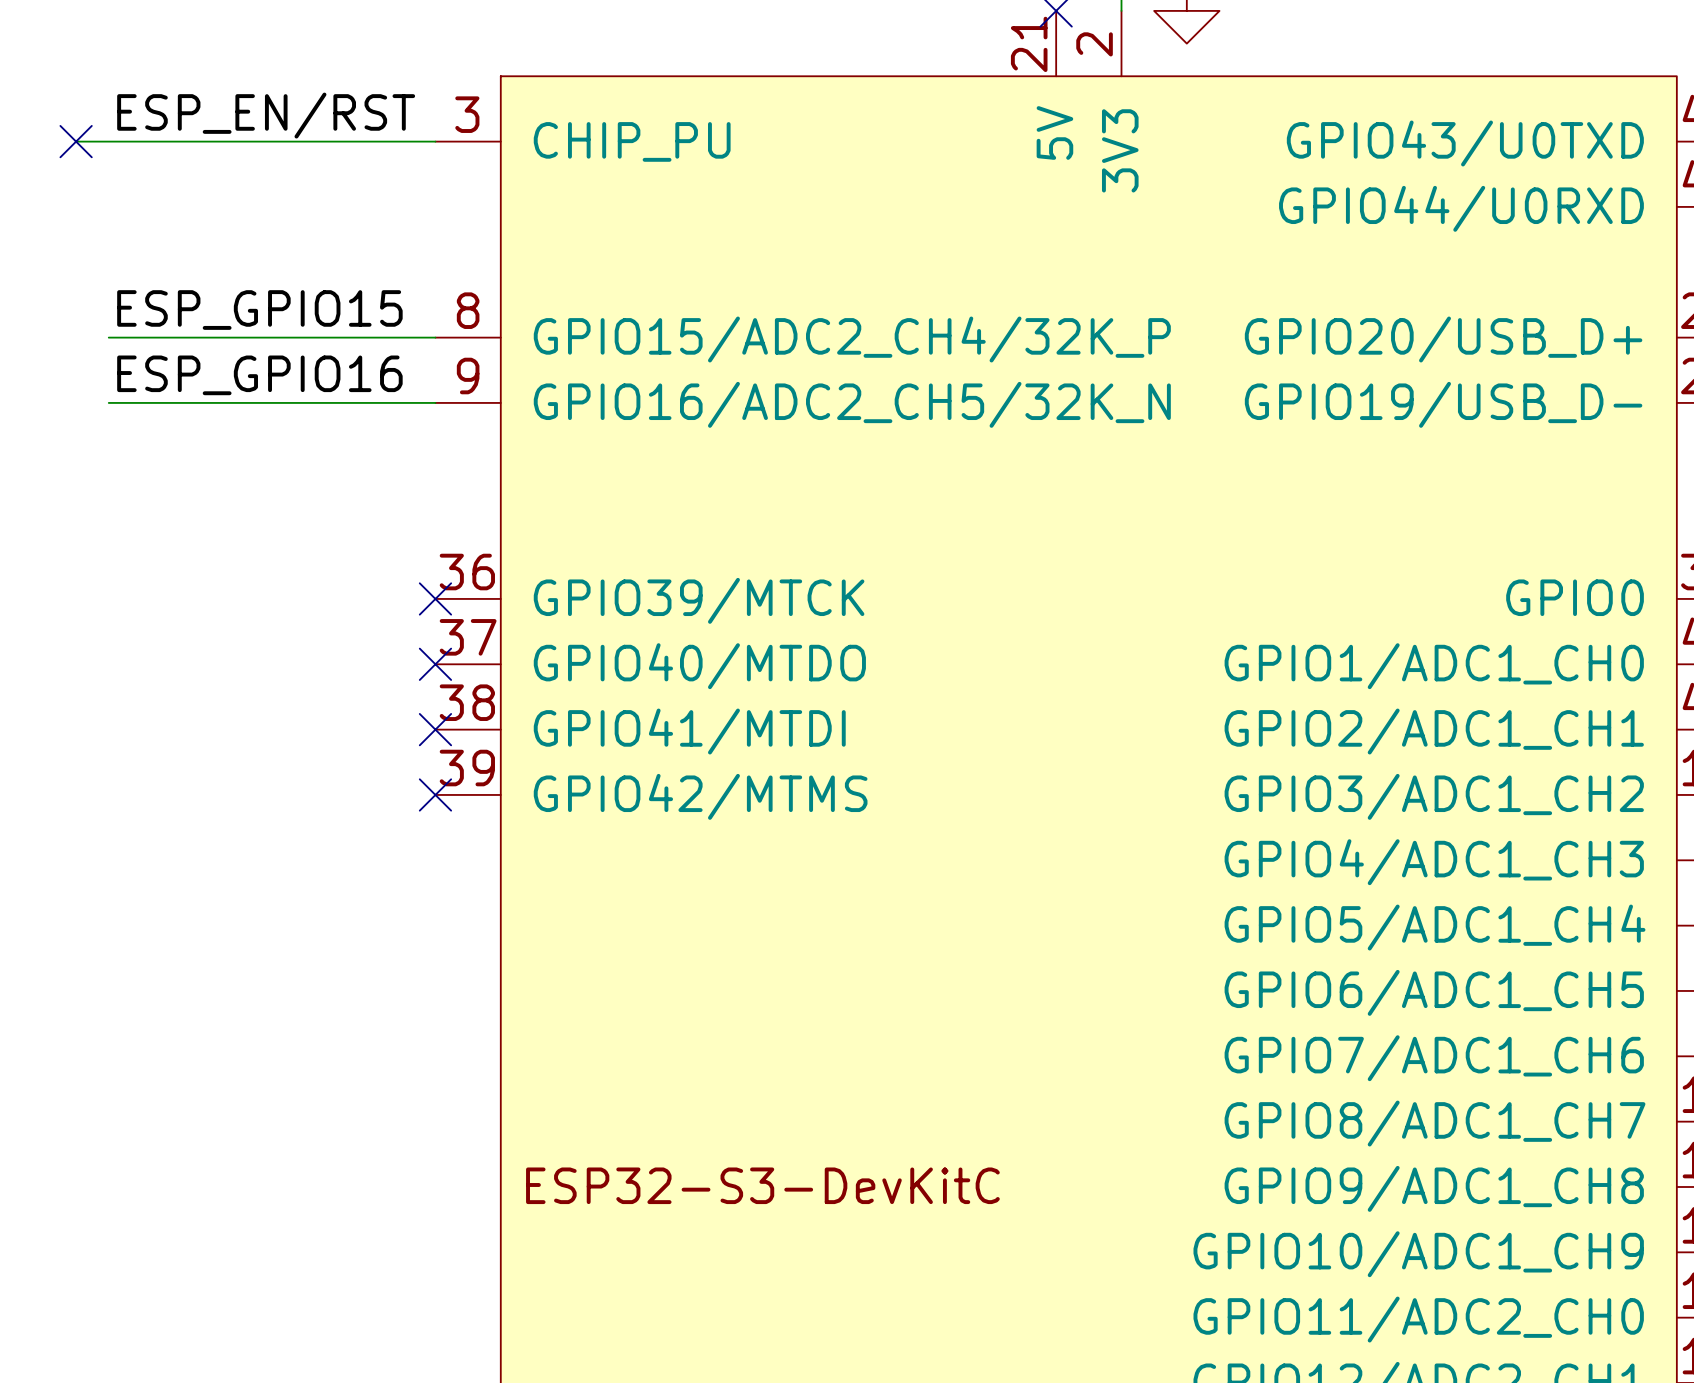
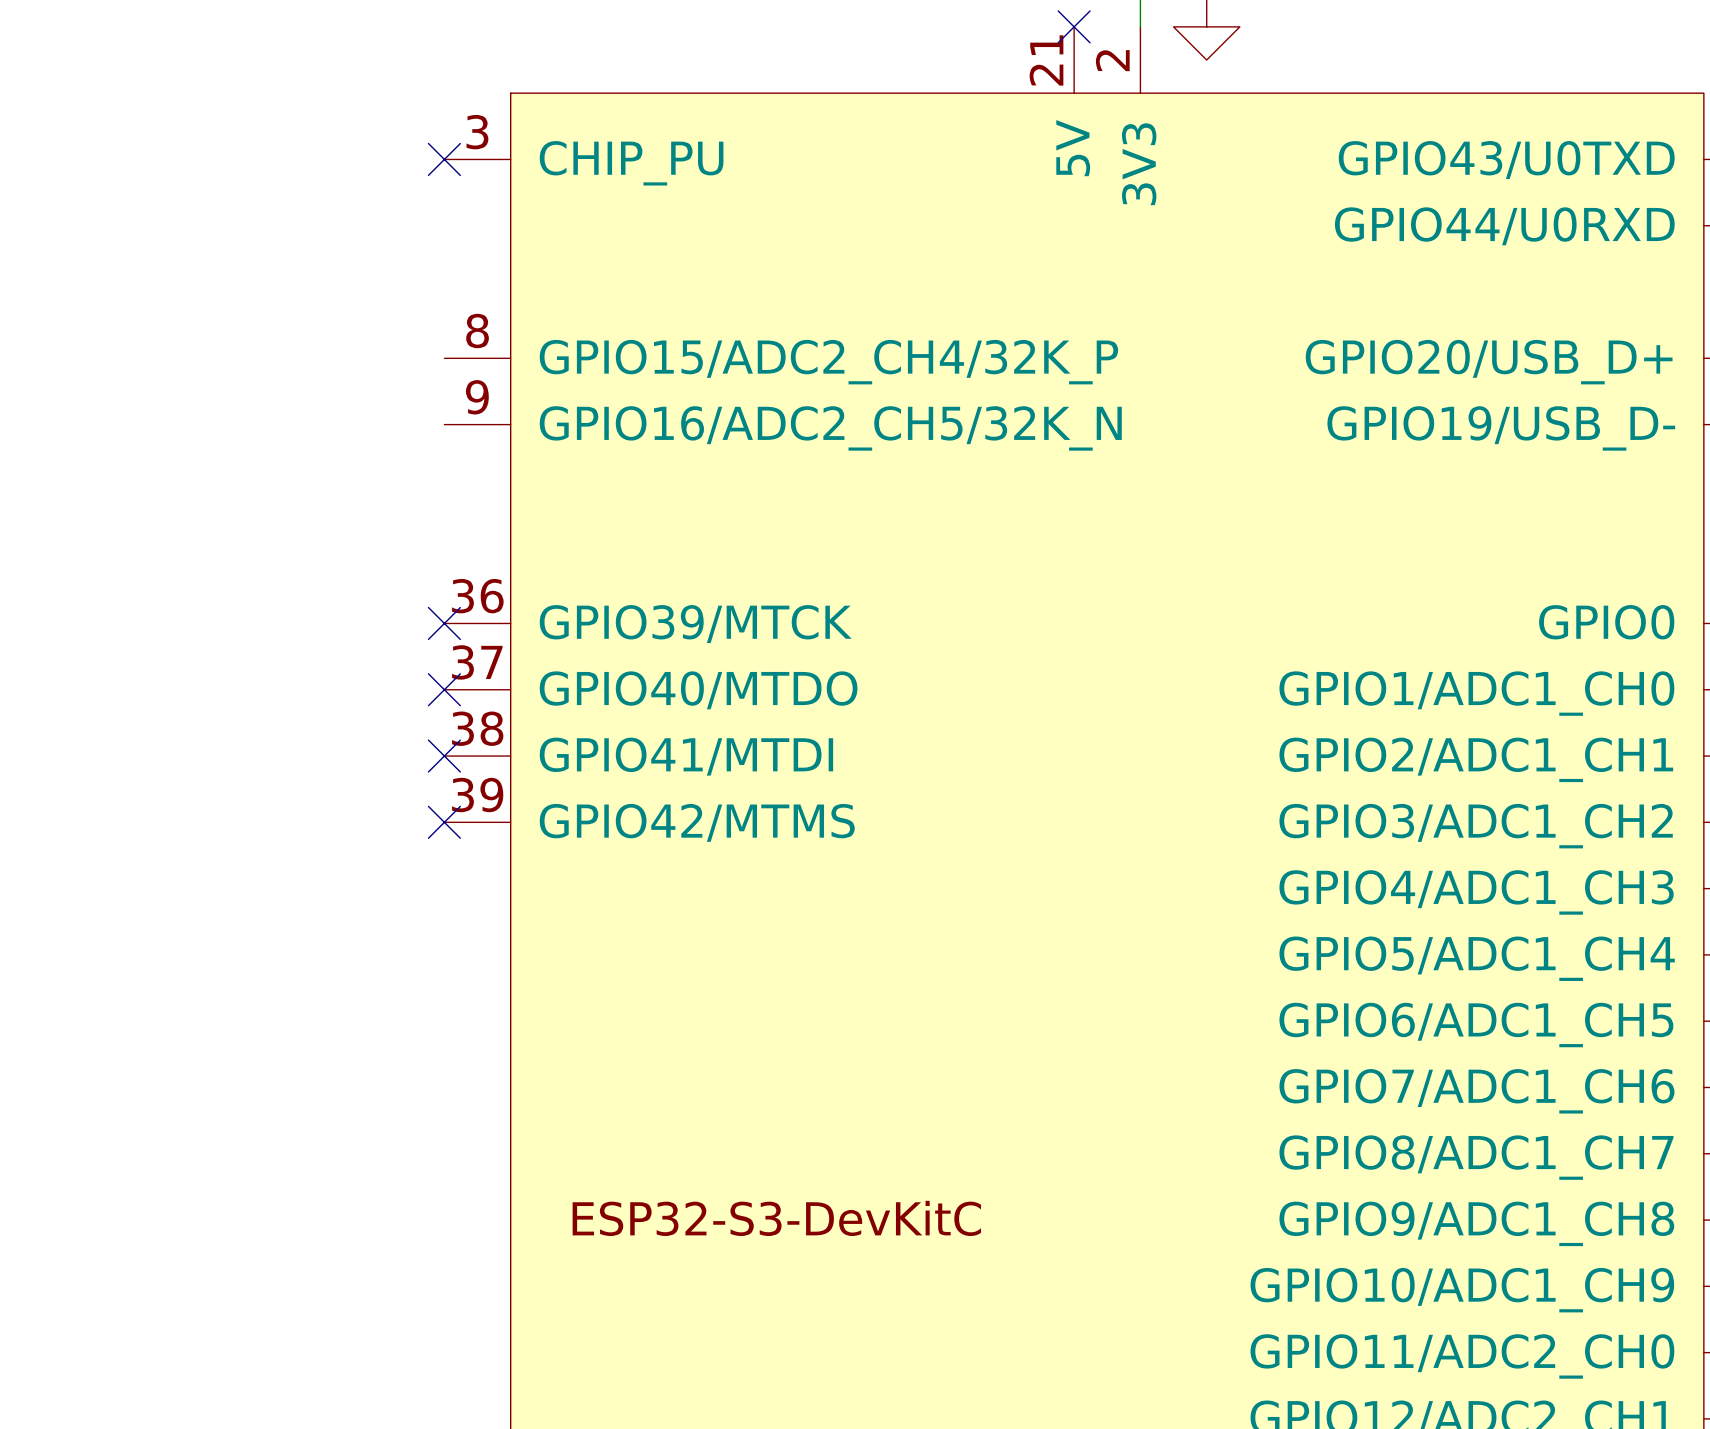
label: ESP_EN/RST (266, 115) -> none
wire: (76, 141) (435, 141) -> none
no-connect mark: (76, 141) -> none
no-connect mark: none -> (444, 159)
label: ESP_GPIO15 (259, 310) -> none
wire: (108, 337) (435, 337) -> none
label: ESP_GPIO16 (259, 375) -> none
wire: (108, 402) (435, 402) -> none

